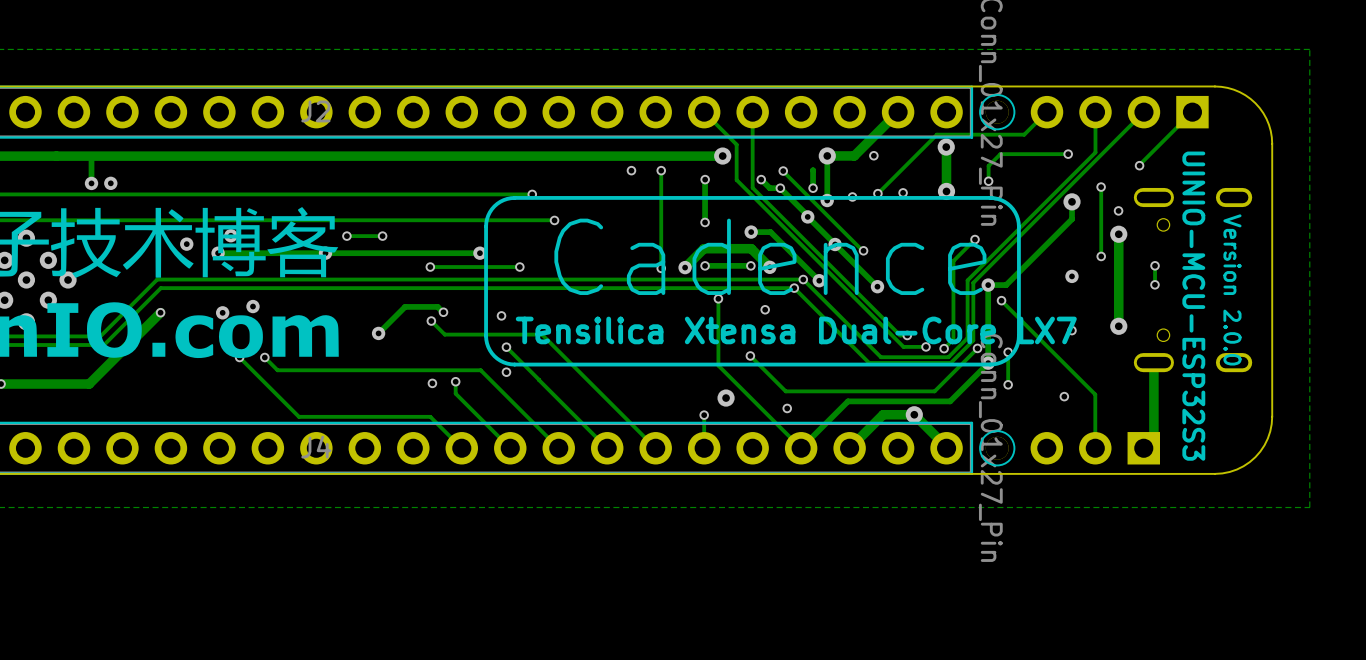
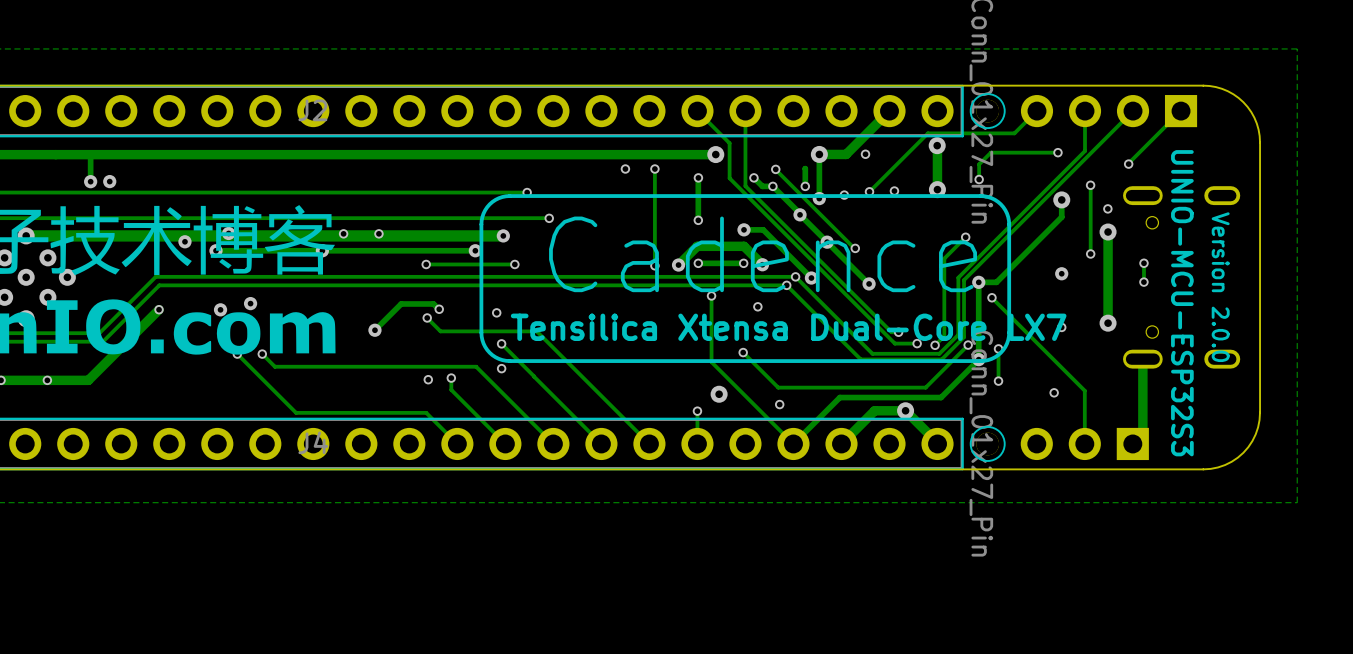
track: none -> (503, 235) (26, 235)
via: none -> (503, 235)
via: none -> (47, 380)

